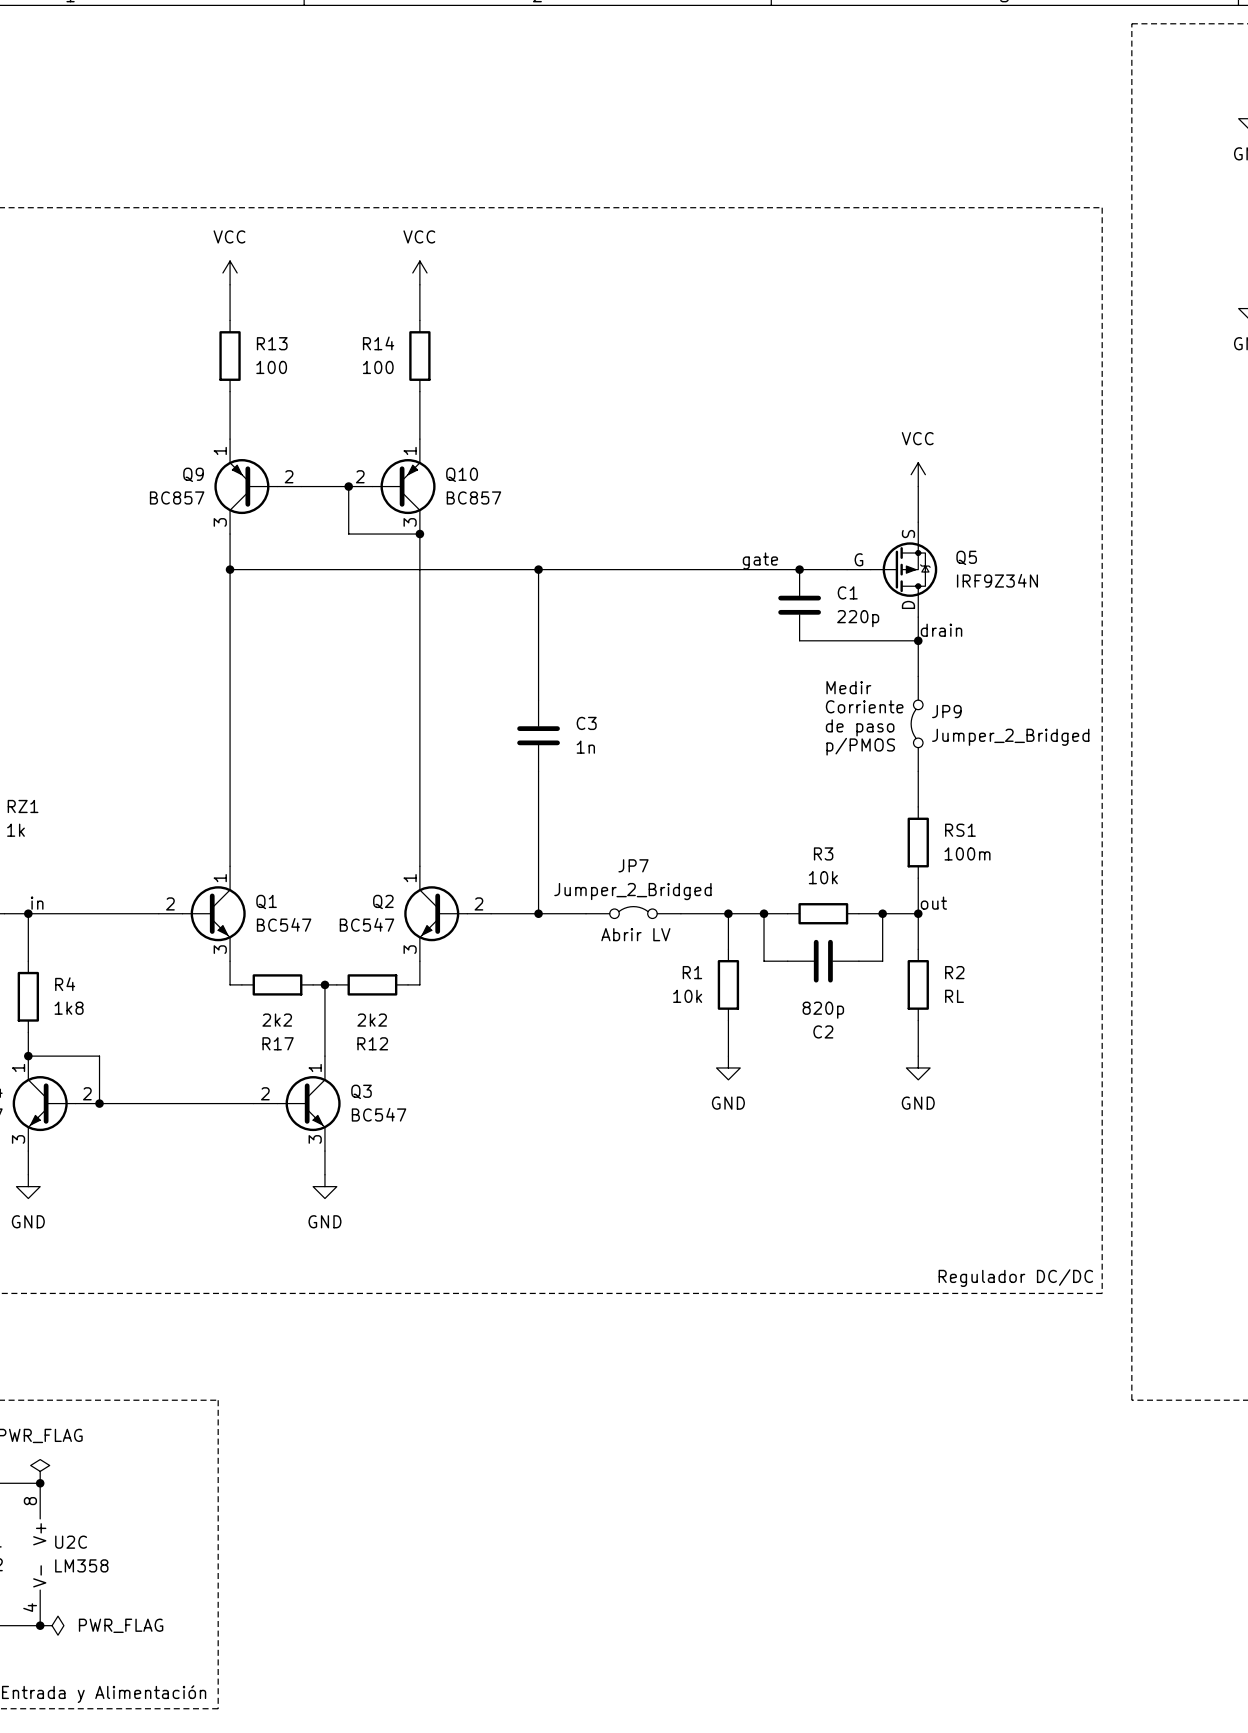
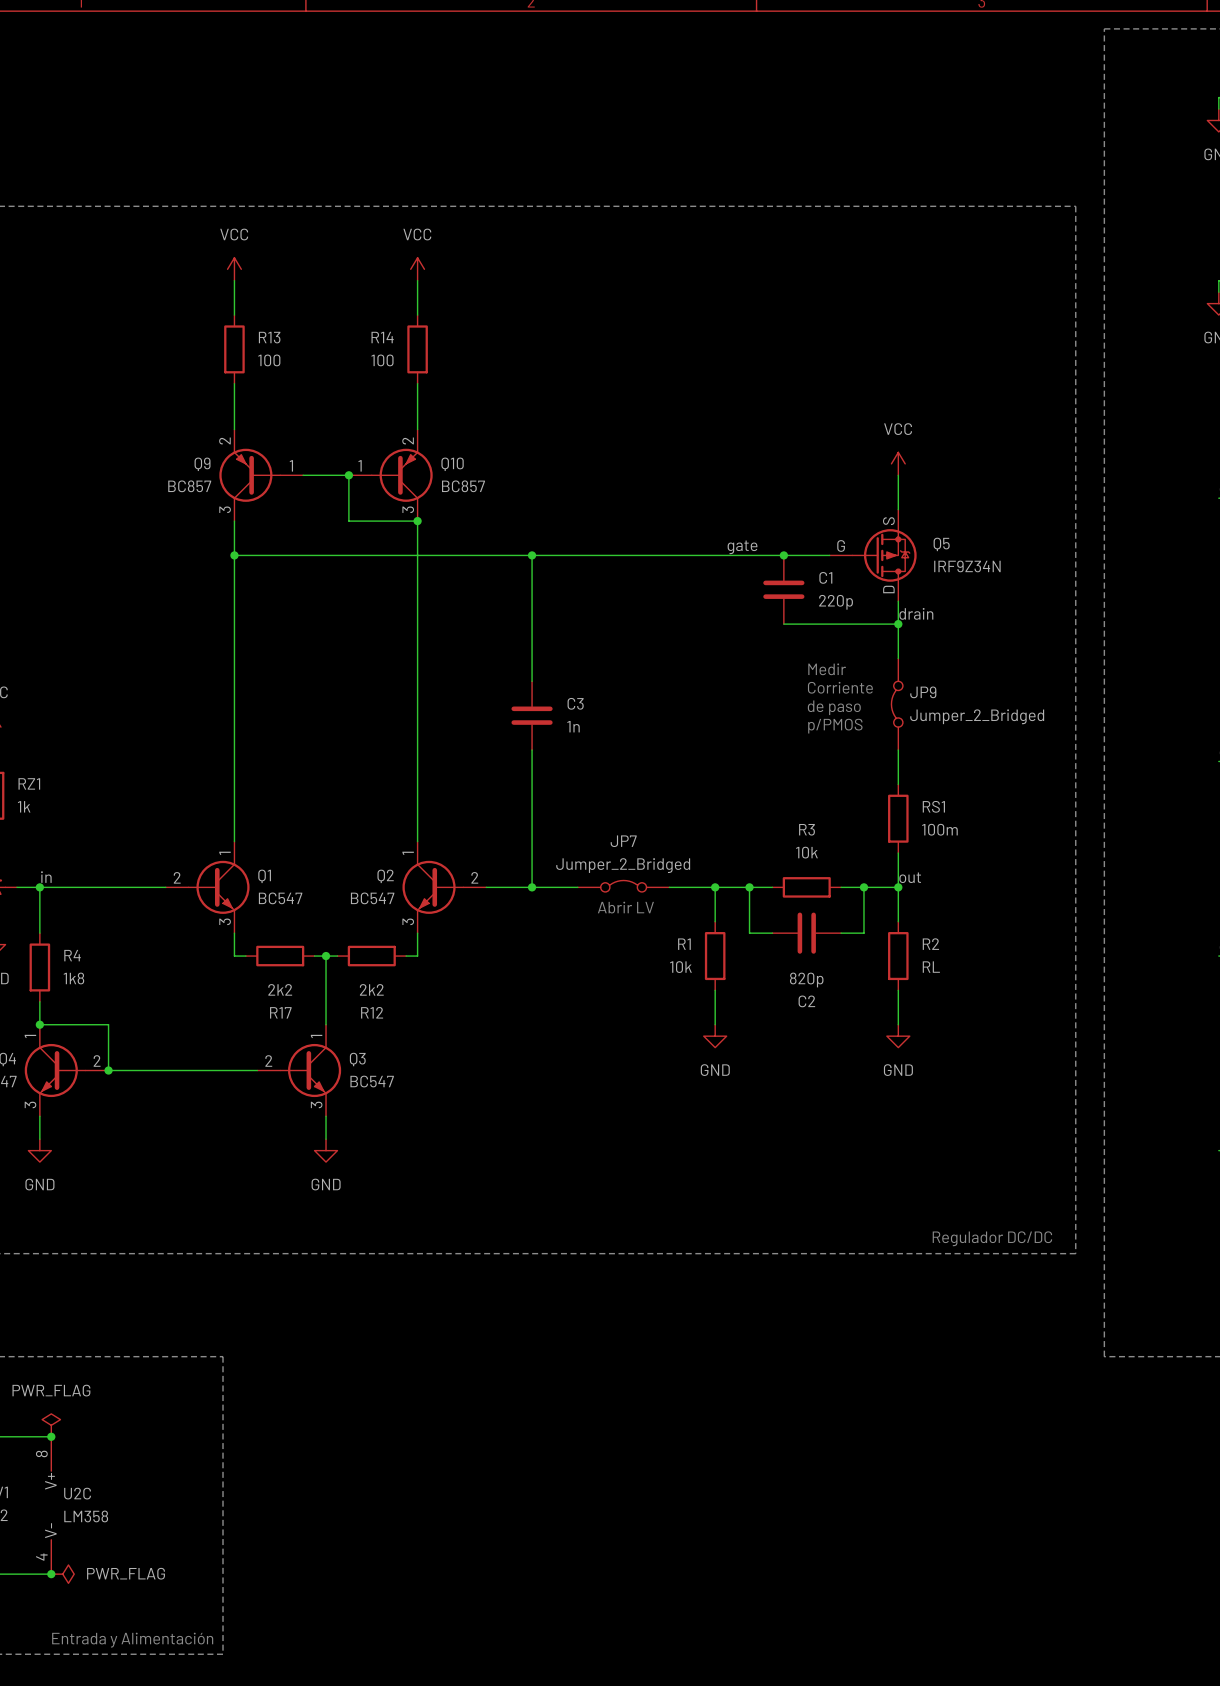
Q9 pin number: 1 (220, 450) -> 2 (224, 440)
Q10 pin number: 1 (410, 450) -> 2 (408, 440)
Q9 pin number: 2 (289, 476) -> 1 (291, 465)
Q10 pin number: 2 (360, 476) -> 1 (360, 465)

